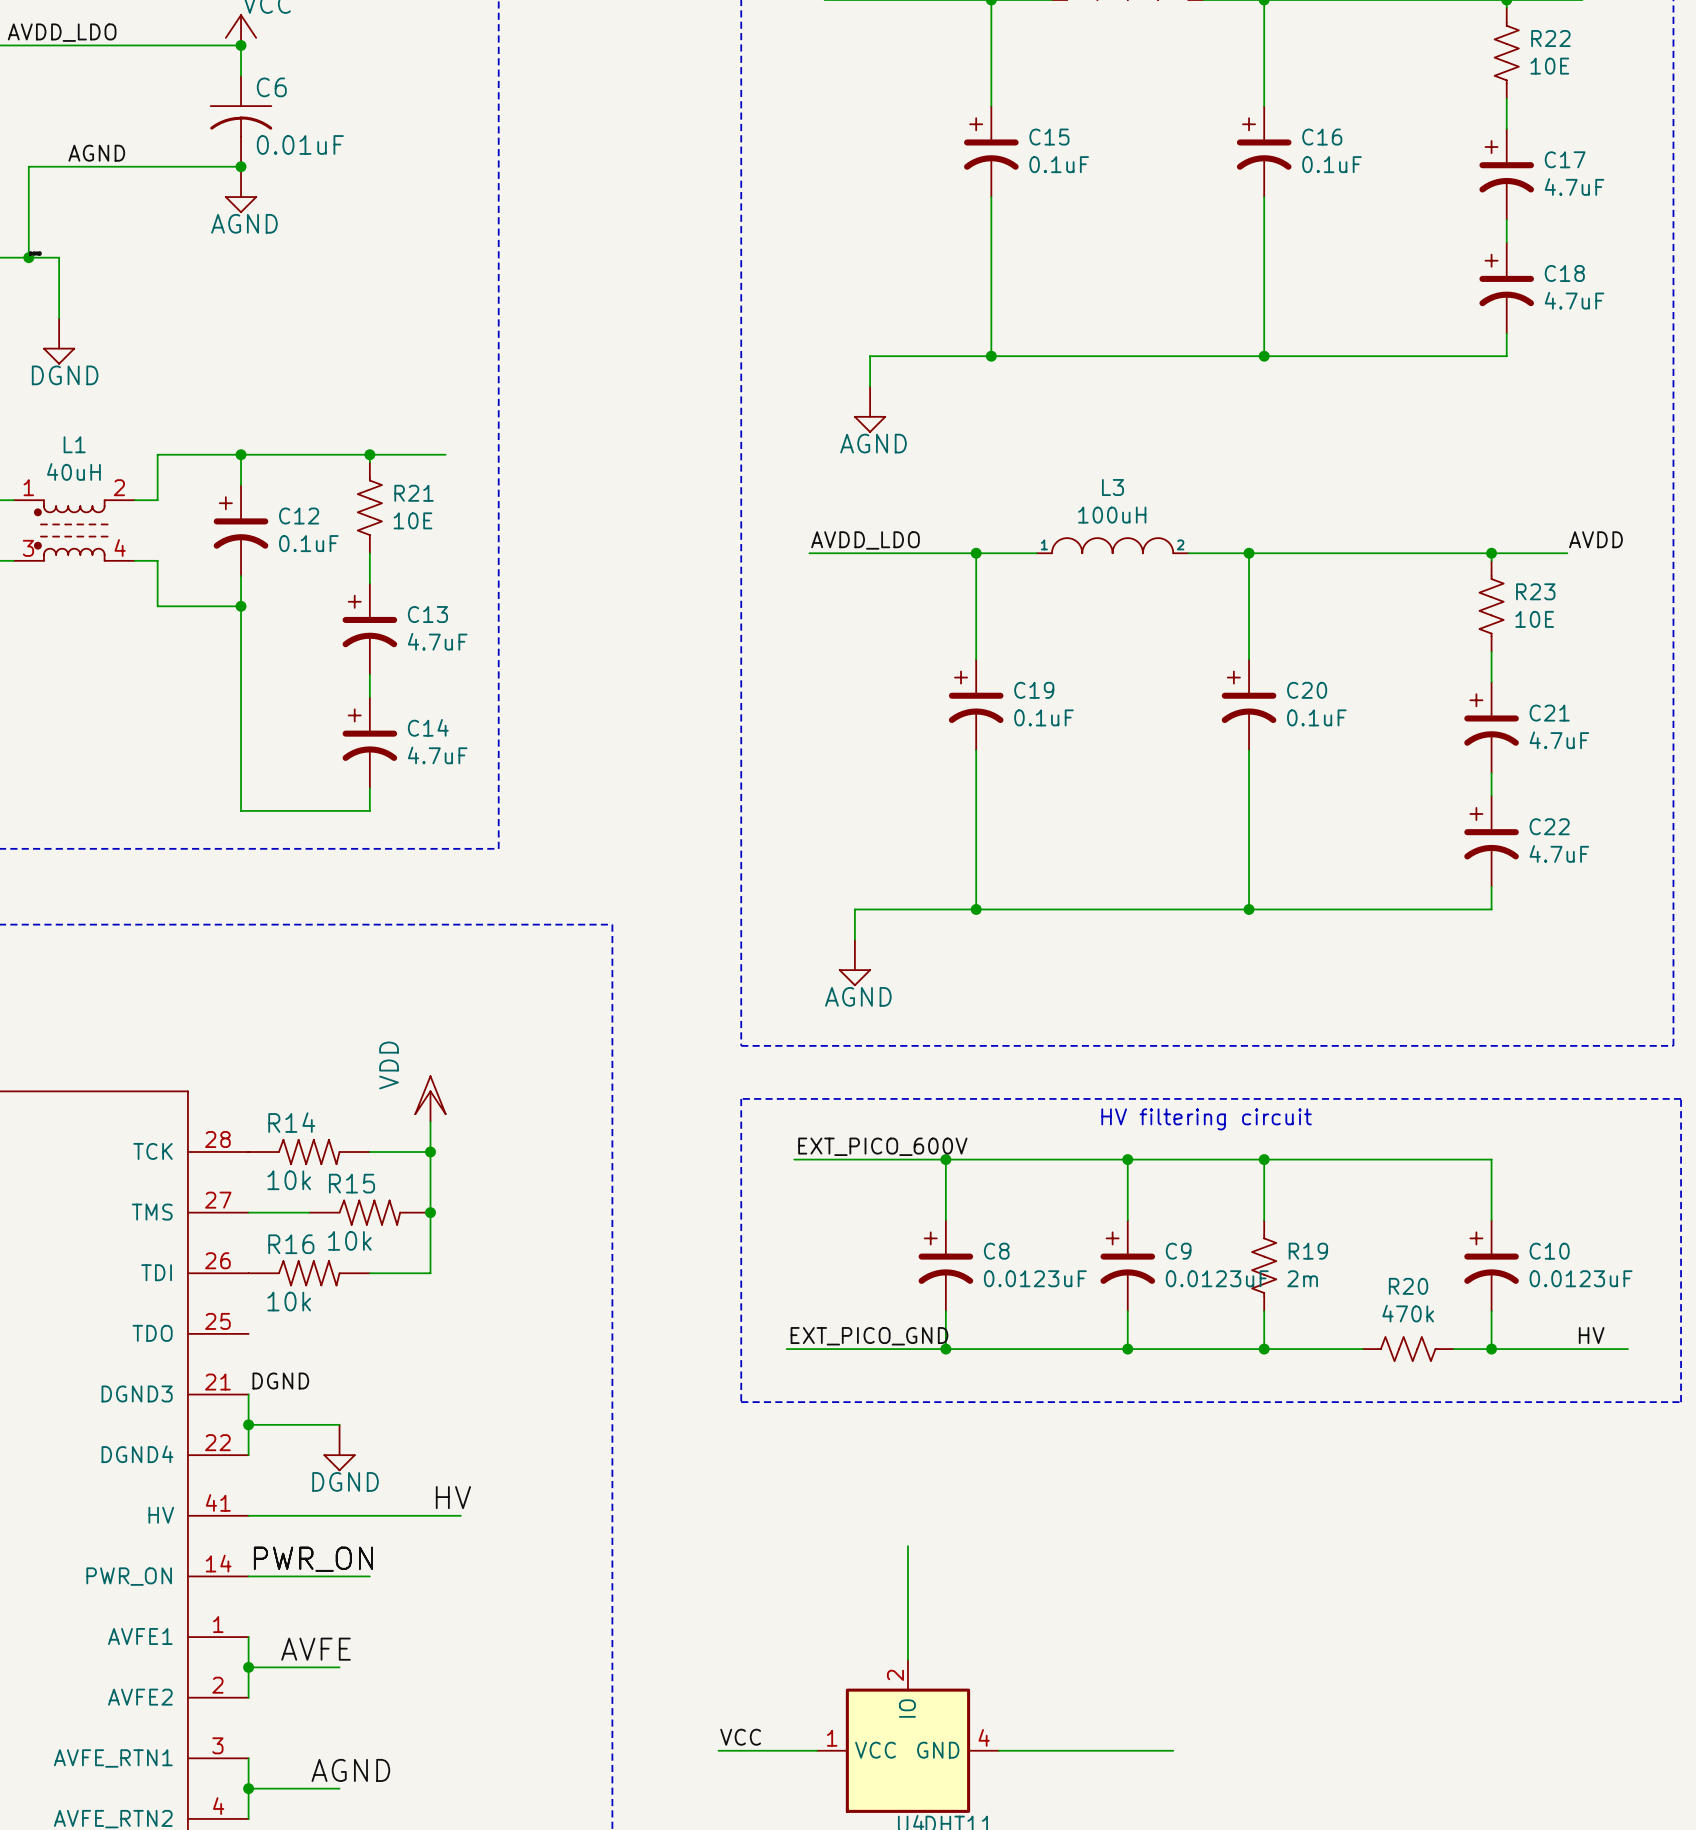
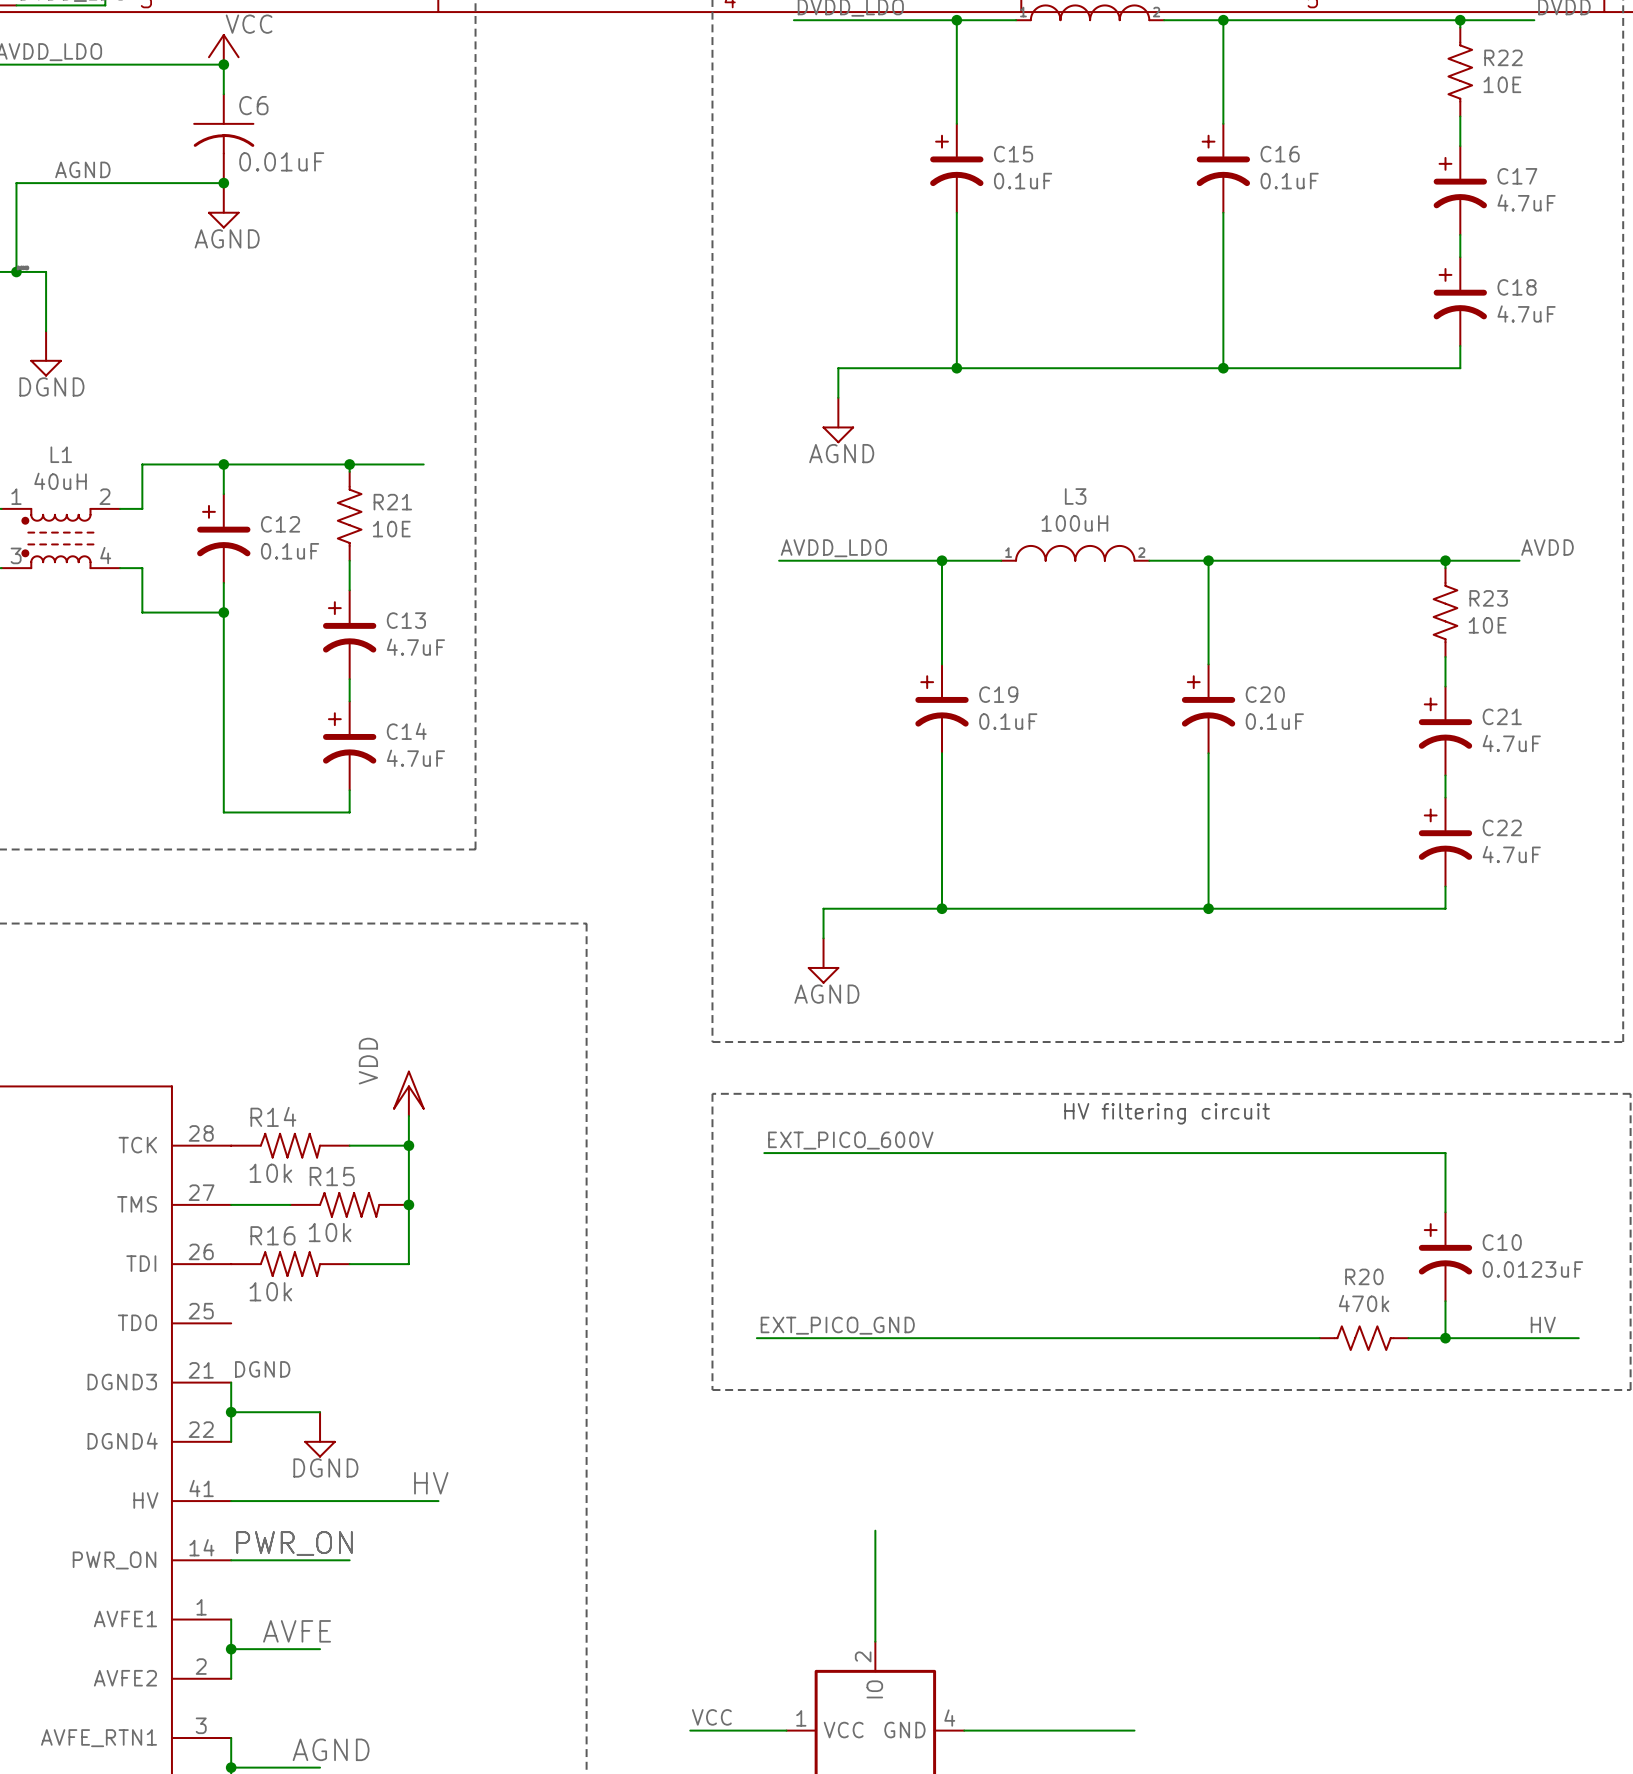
wire: (945, 1159) (945, 1220) -> none
junction: (945, 1159) -> none
wire: (1127, 1159) (1127, 1220) -> none
junction: (1127, 1159) -> none
wire: (1264, 1159) (1264, 1220) -> none
junction: (1264, 1159) -> none
C8: 0.0123uF (945, 1265) -> none
C9: 0.0123uF (1127, 1265) -> none
R19: 2m (1264, 1265) -> none
wire: (945, 1311) (945, 1349) -> none
wire: (1127, 1311) (1127, 1349) -> none
wire: (1264, 1311) (1264, 1349) -> none
junction: (945, 1349) -> none
junction: (1127, 1349) -> none
junction: (1264, 1349) -> none

